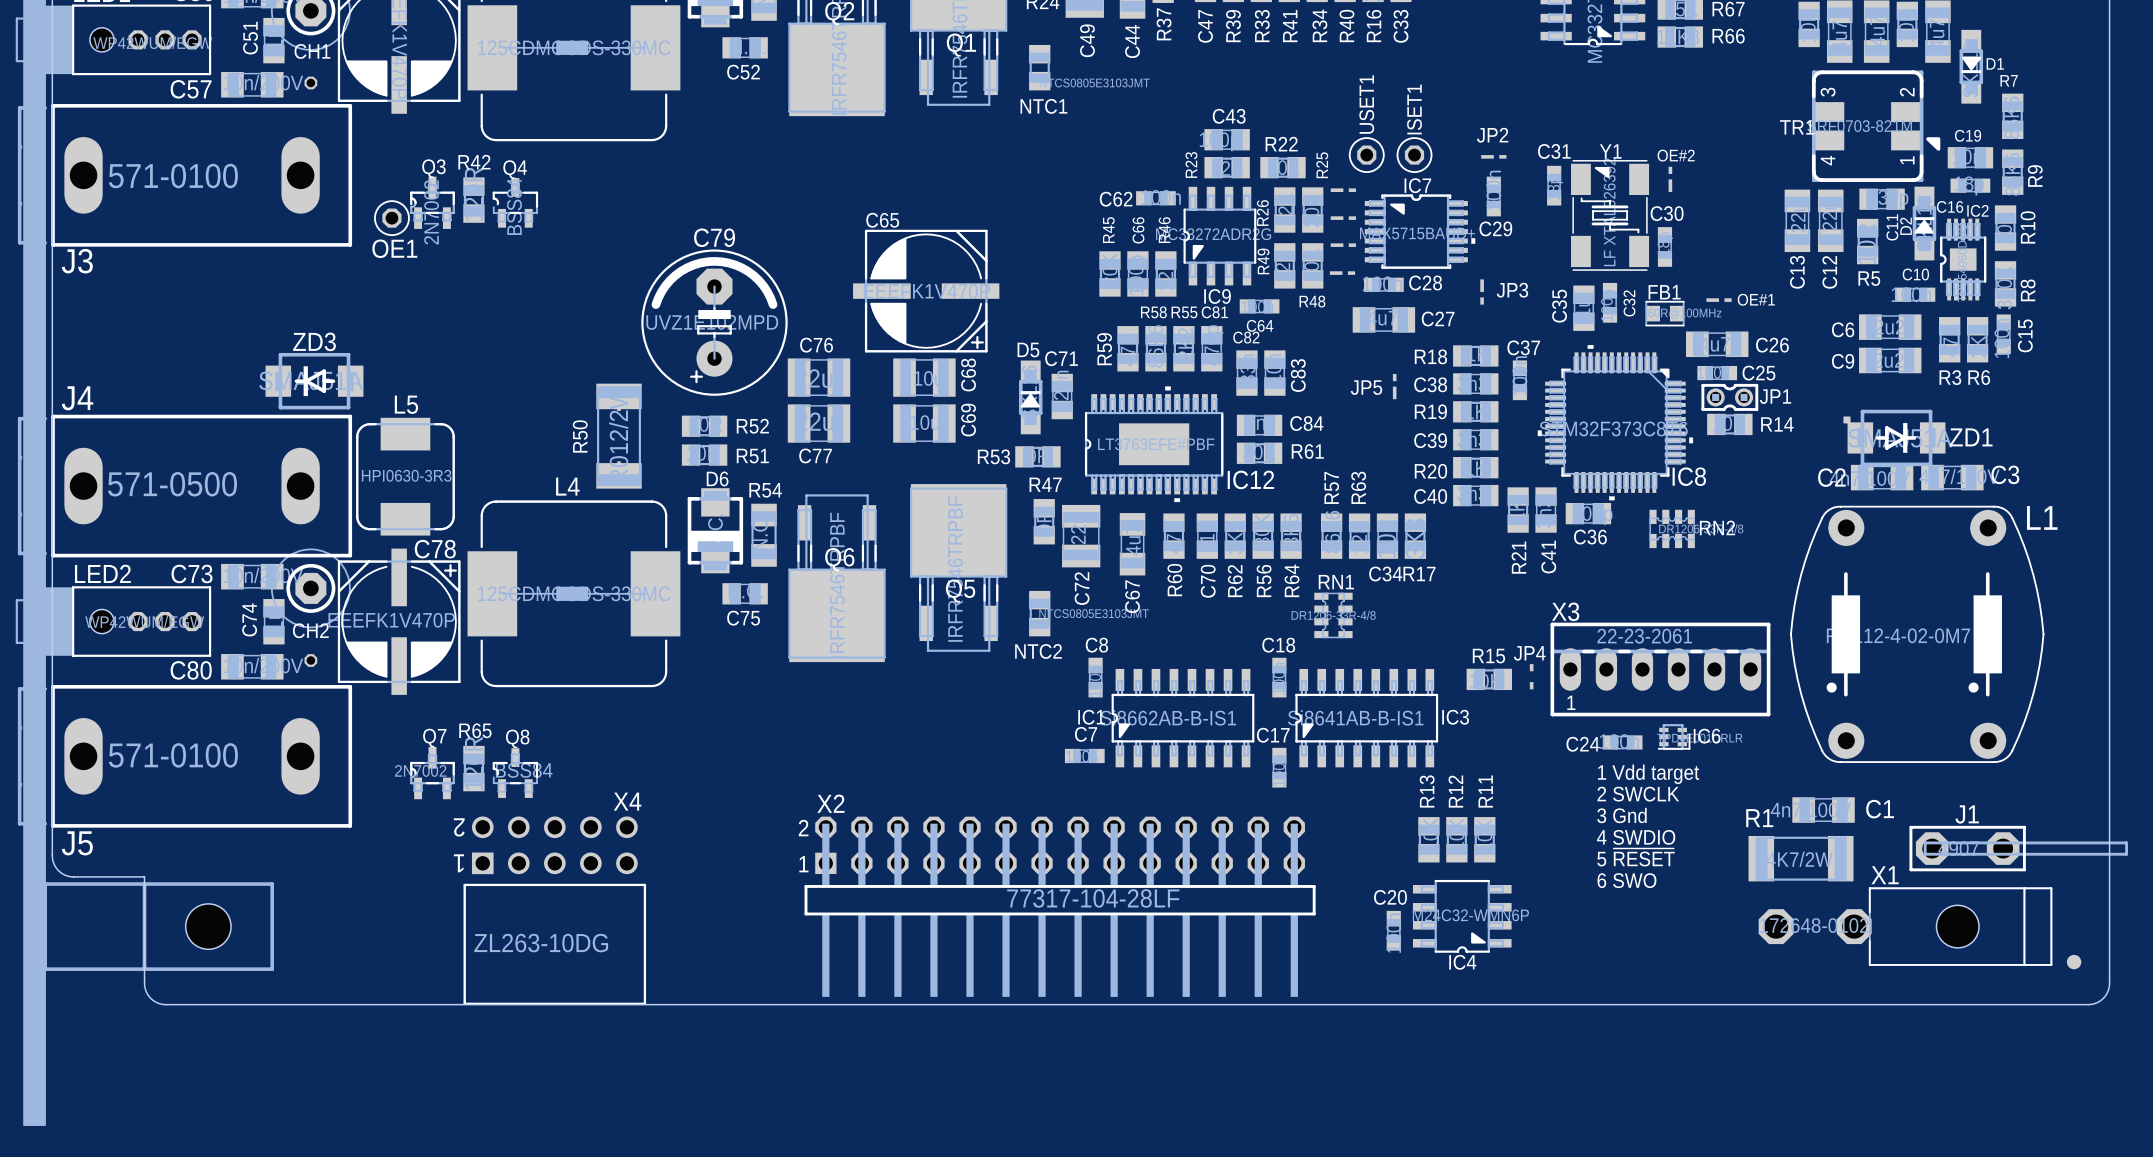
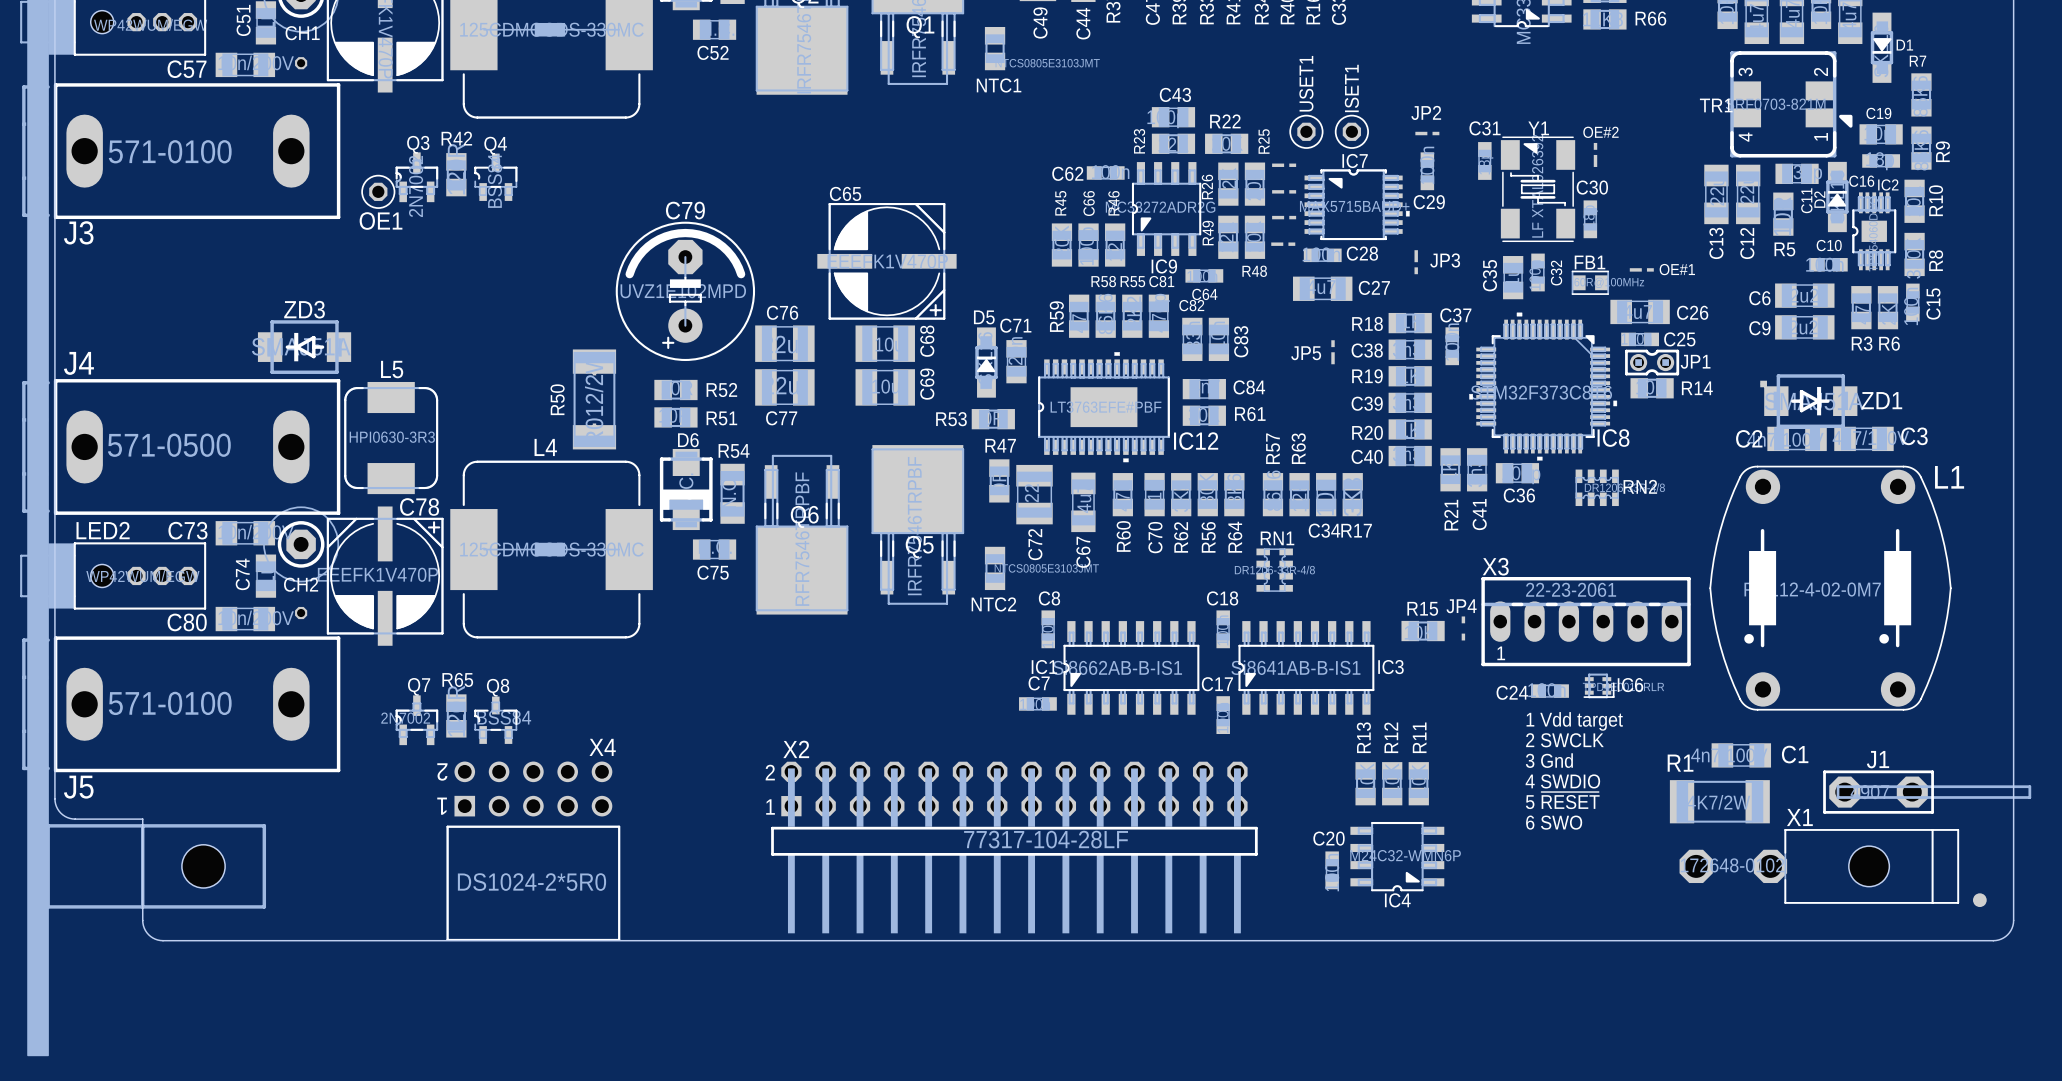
X4 value: ZL263-10DG (541, 943) -> DS1024-2*5R0 (531, 882)

